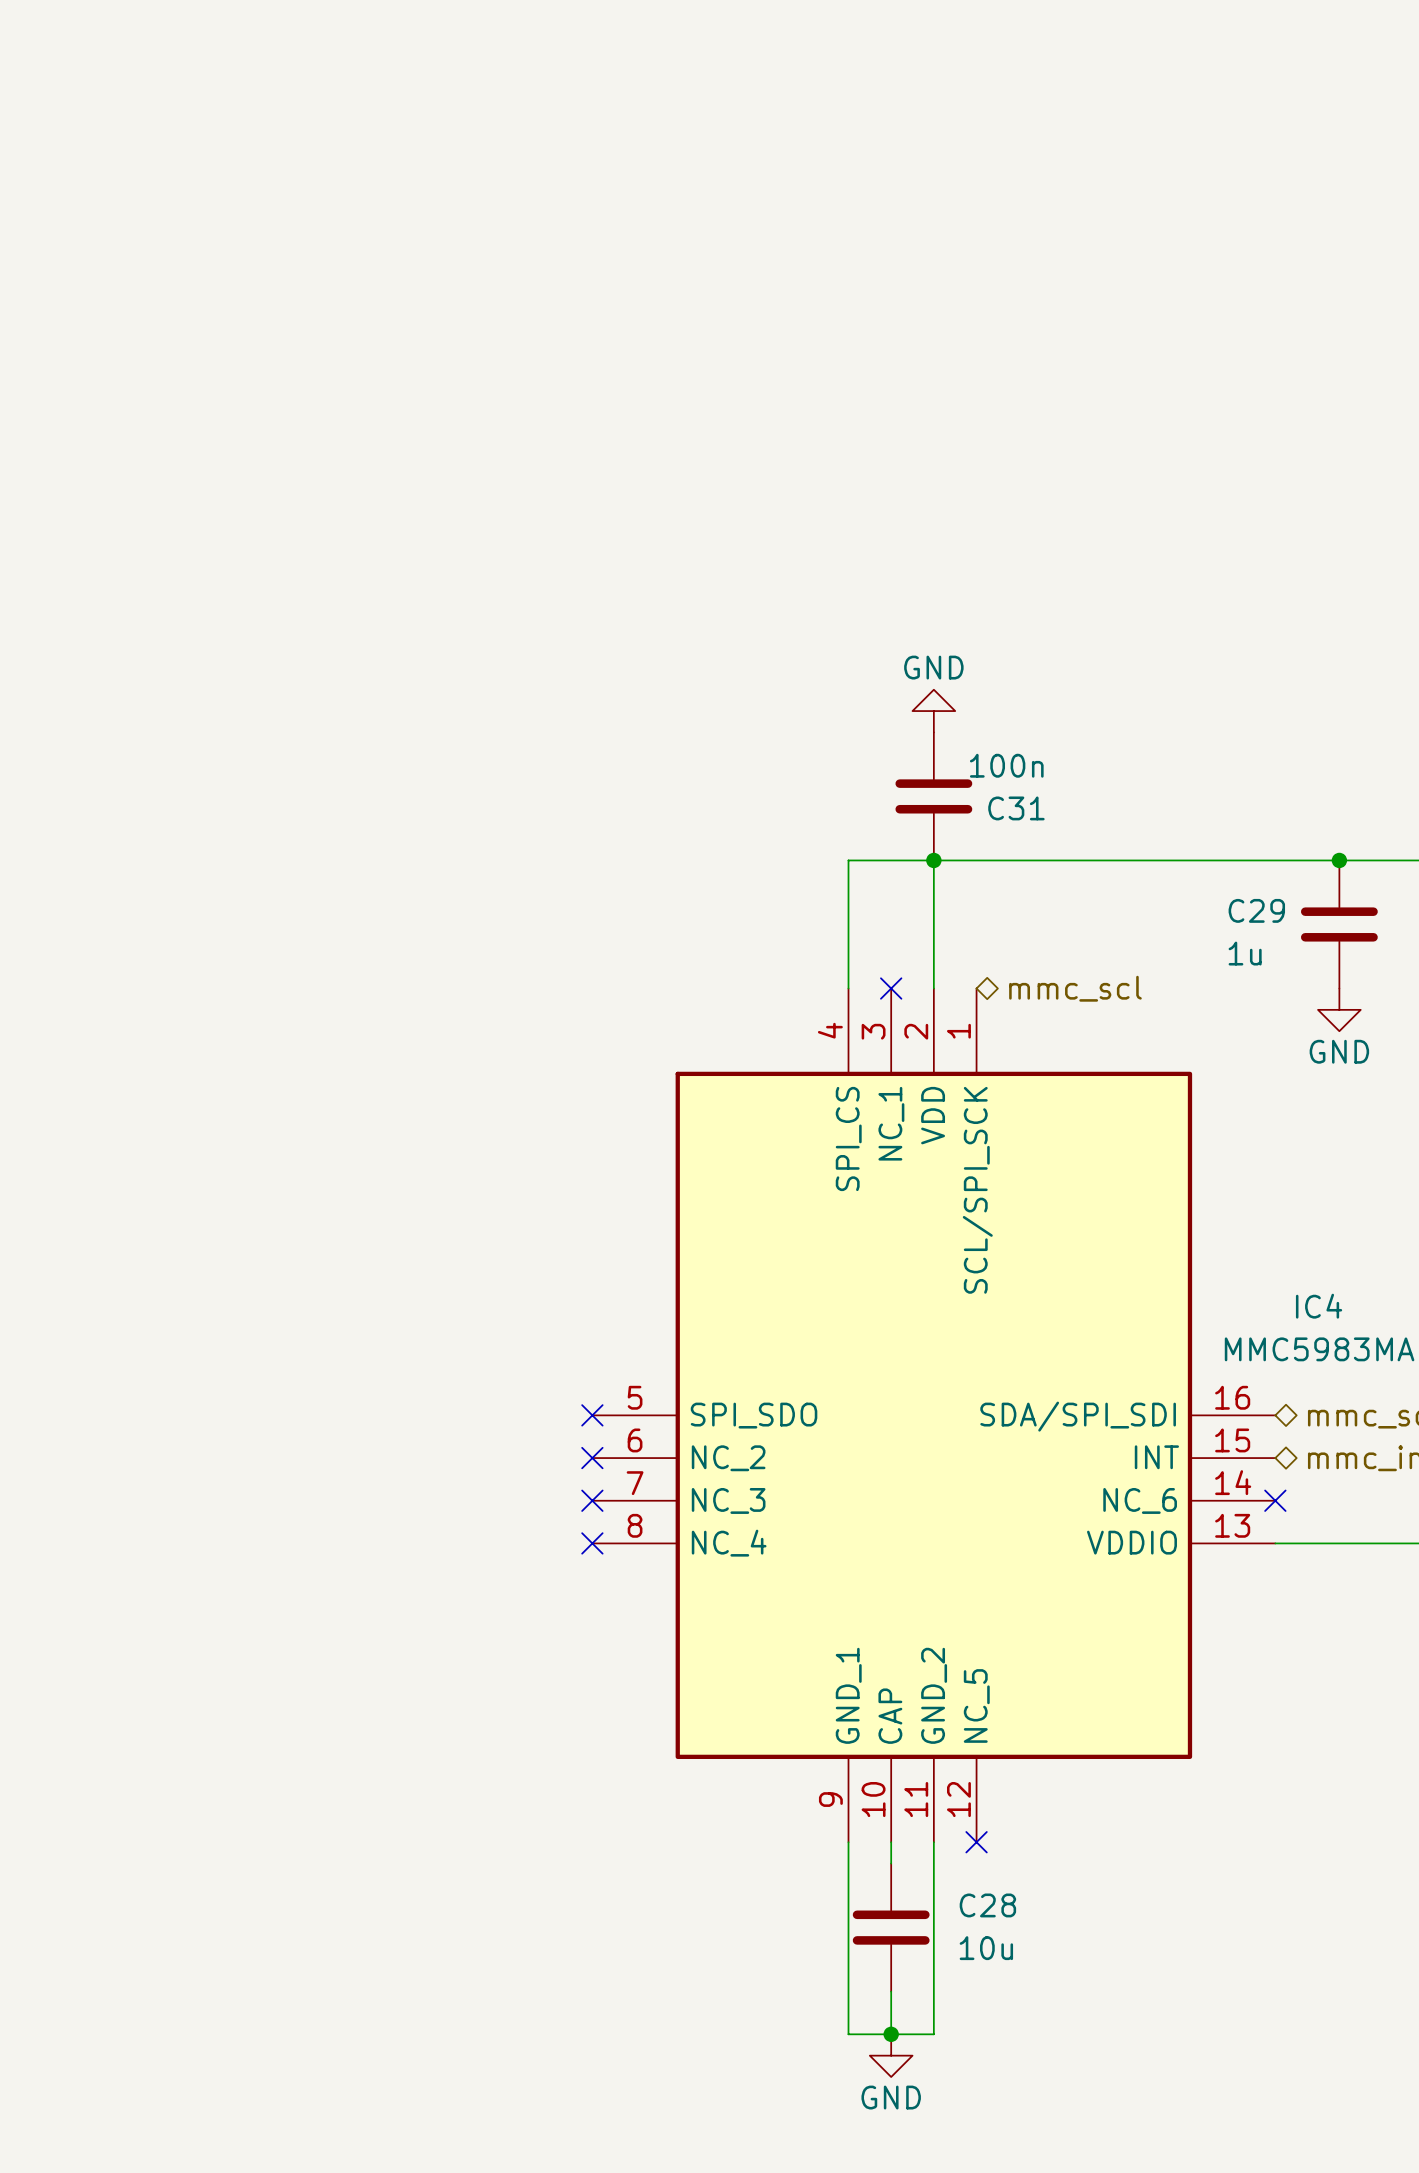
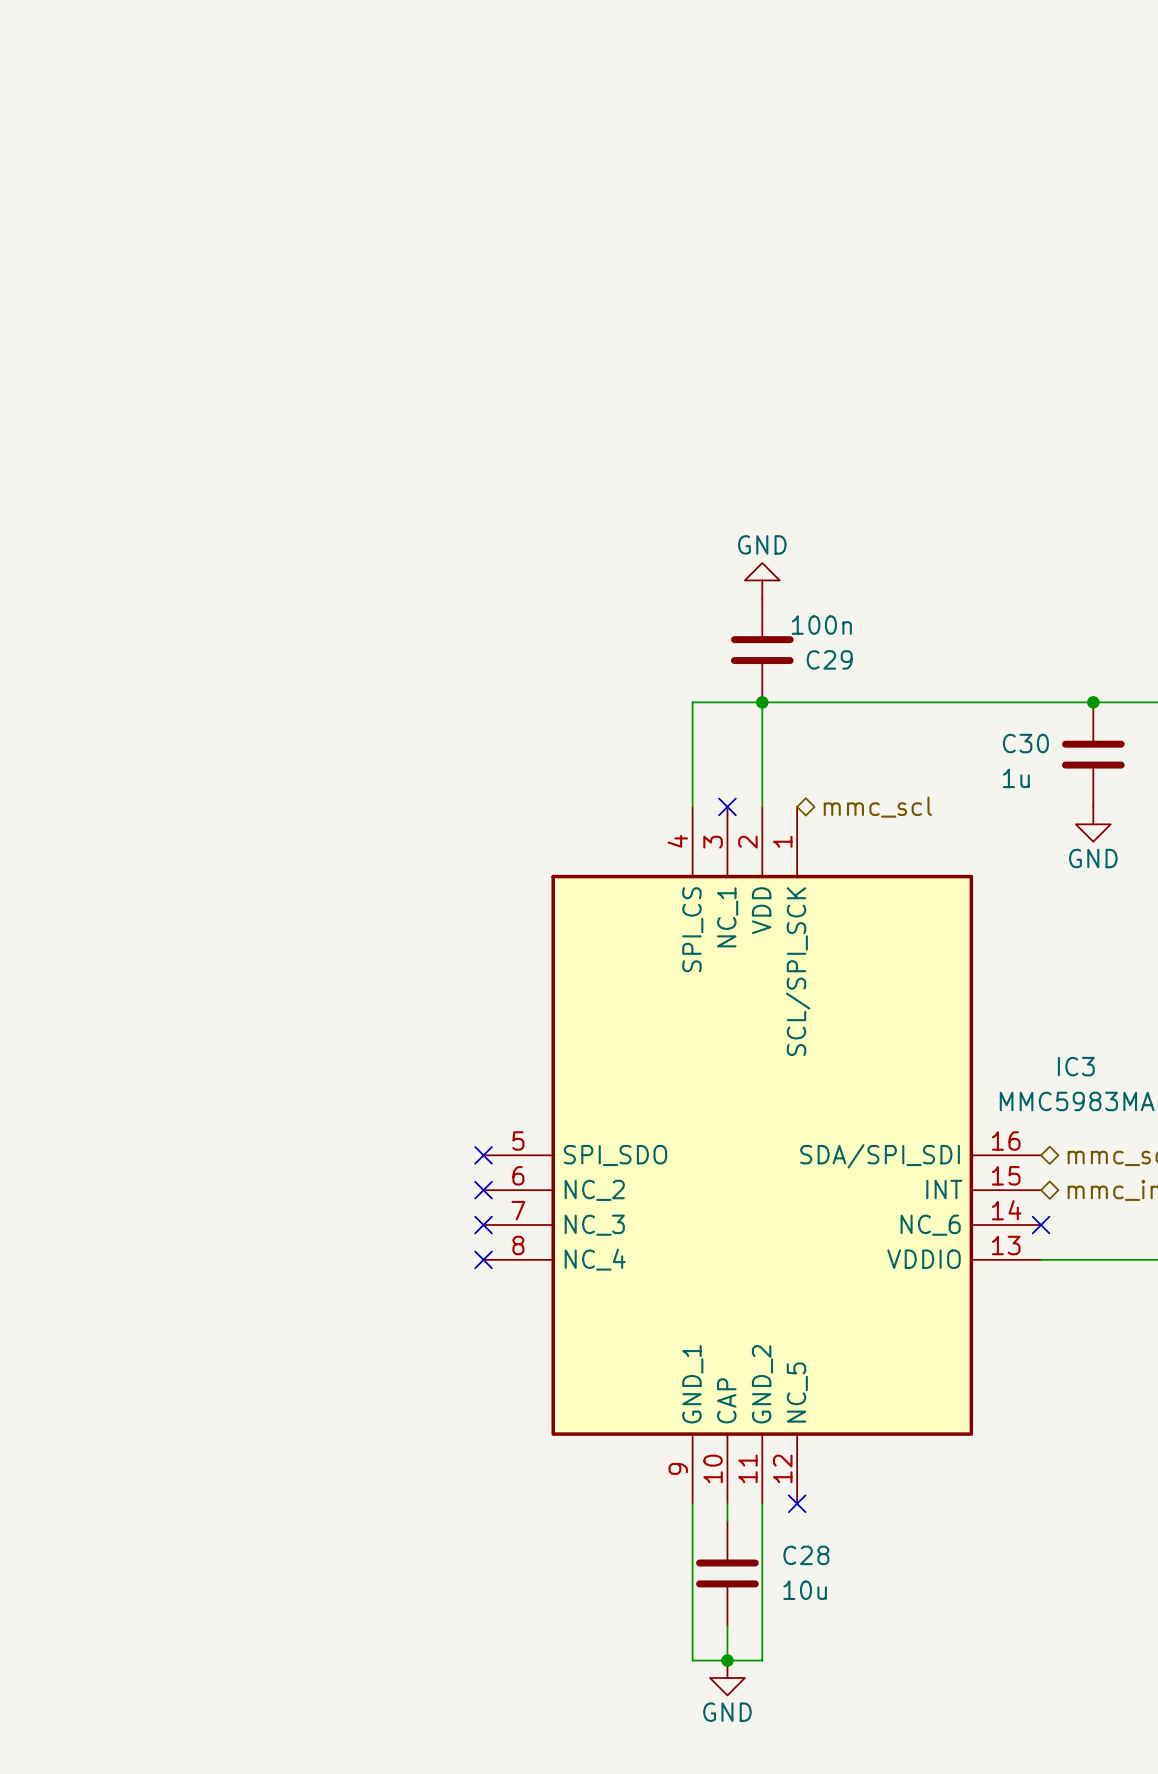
C31 name: C31 (1016, 808) -> C29 (829, 659)
C29 name: C29 (1256, 910) -> C30 (1025, 743)
IC4 name: IC4 (1319, 1306) -> IC3 (1076, 1066)

